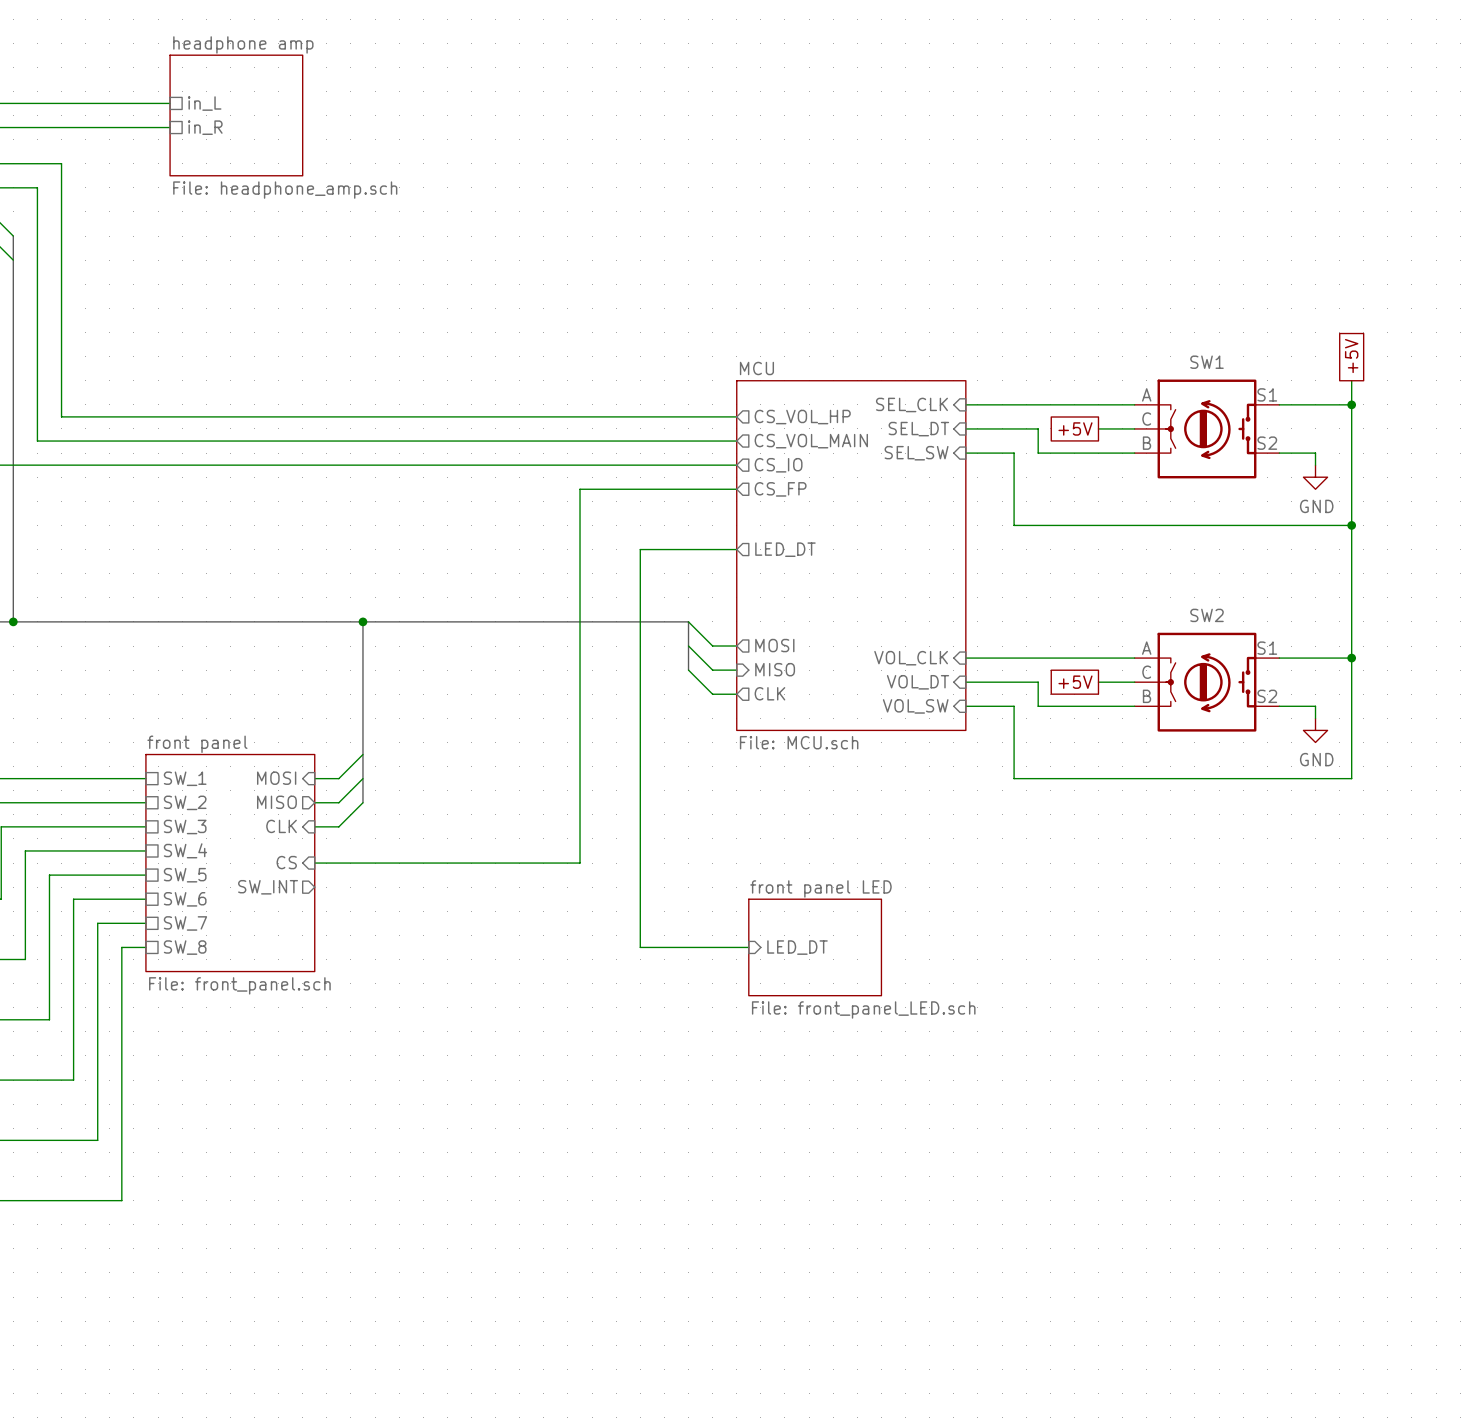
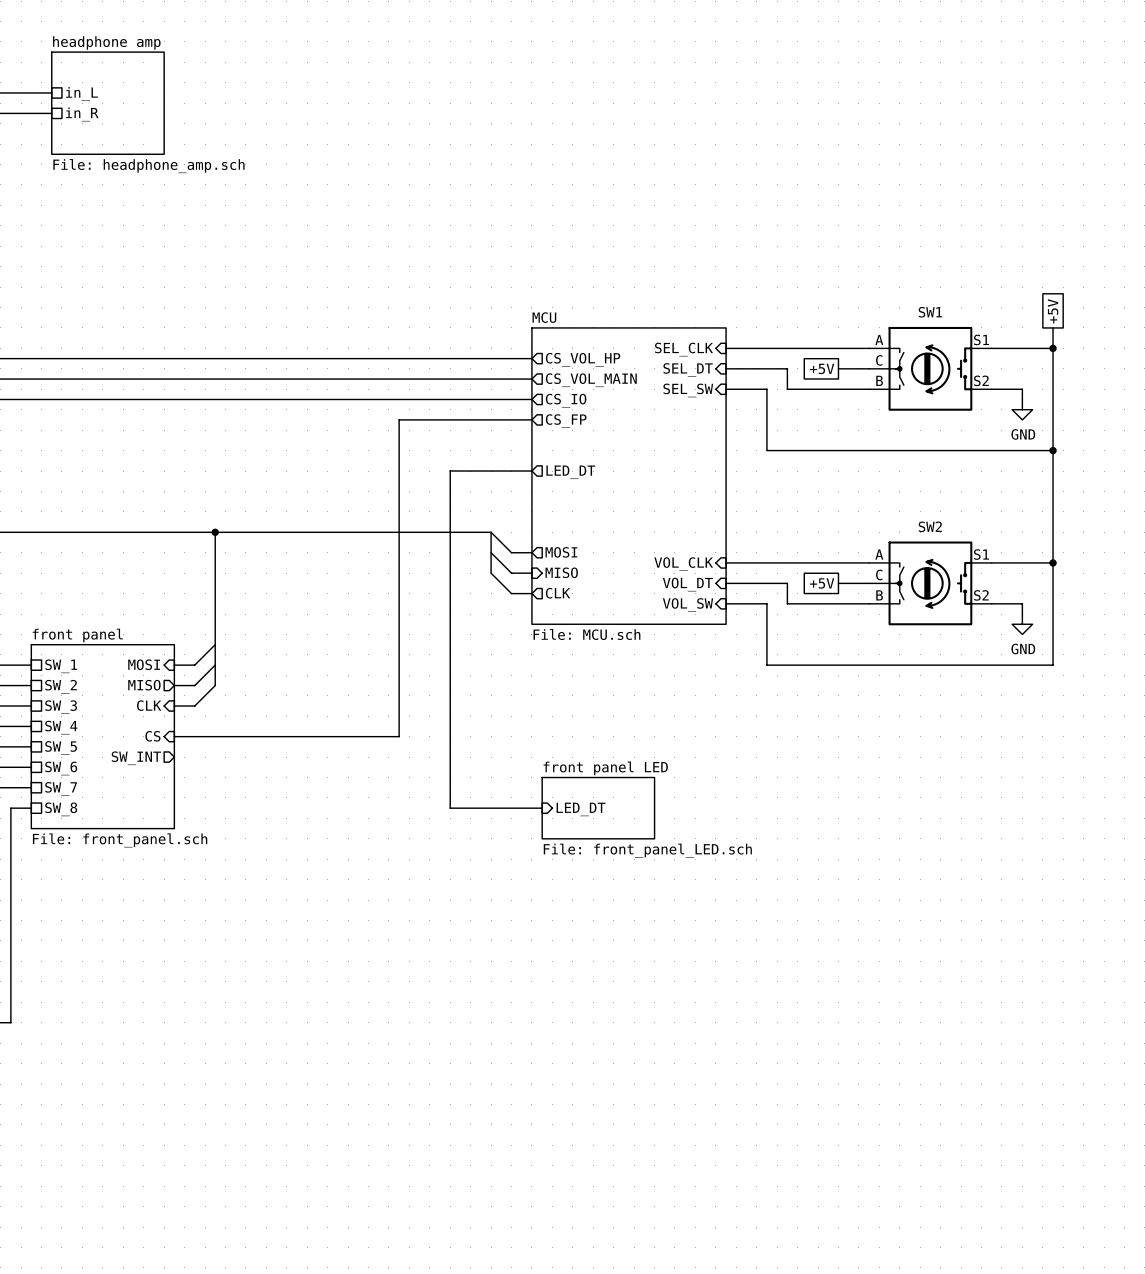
sheet front panel LED shape: [748, 899, 882, 996] -> [542, 777, 655, 839]

